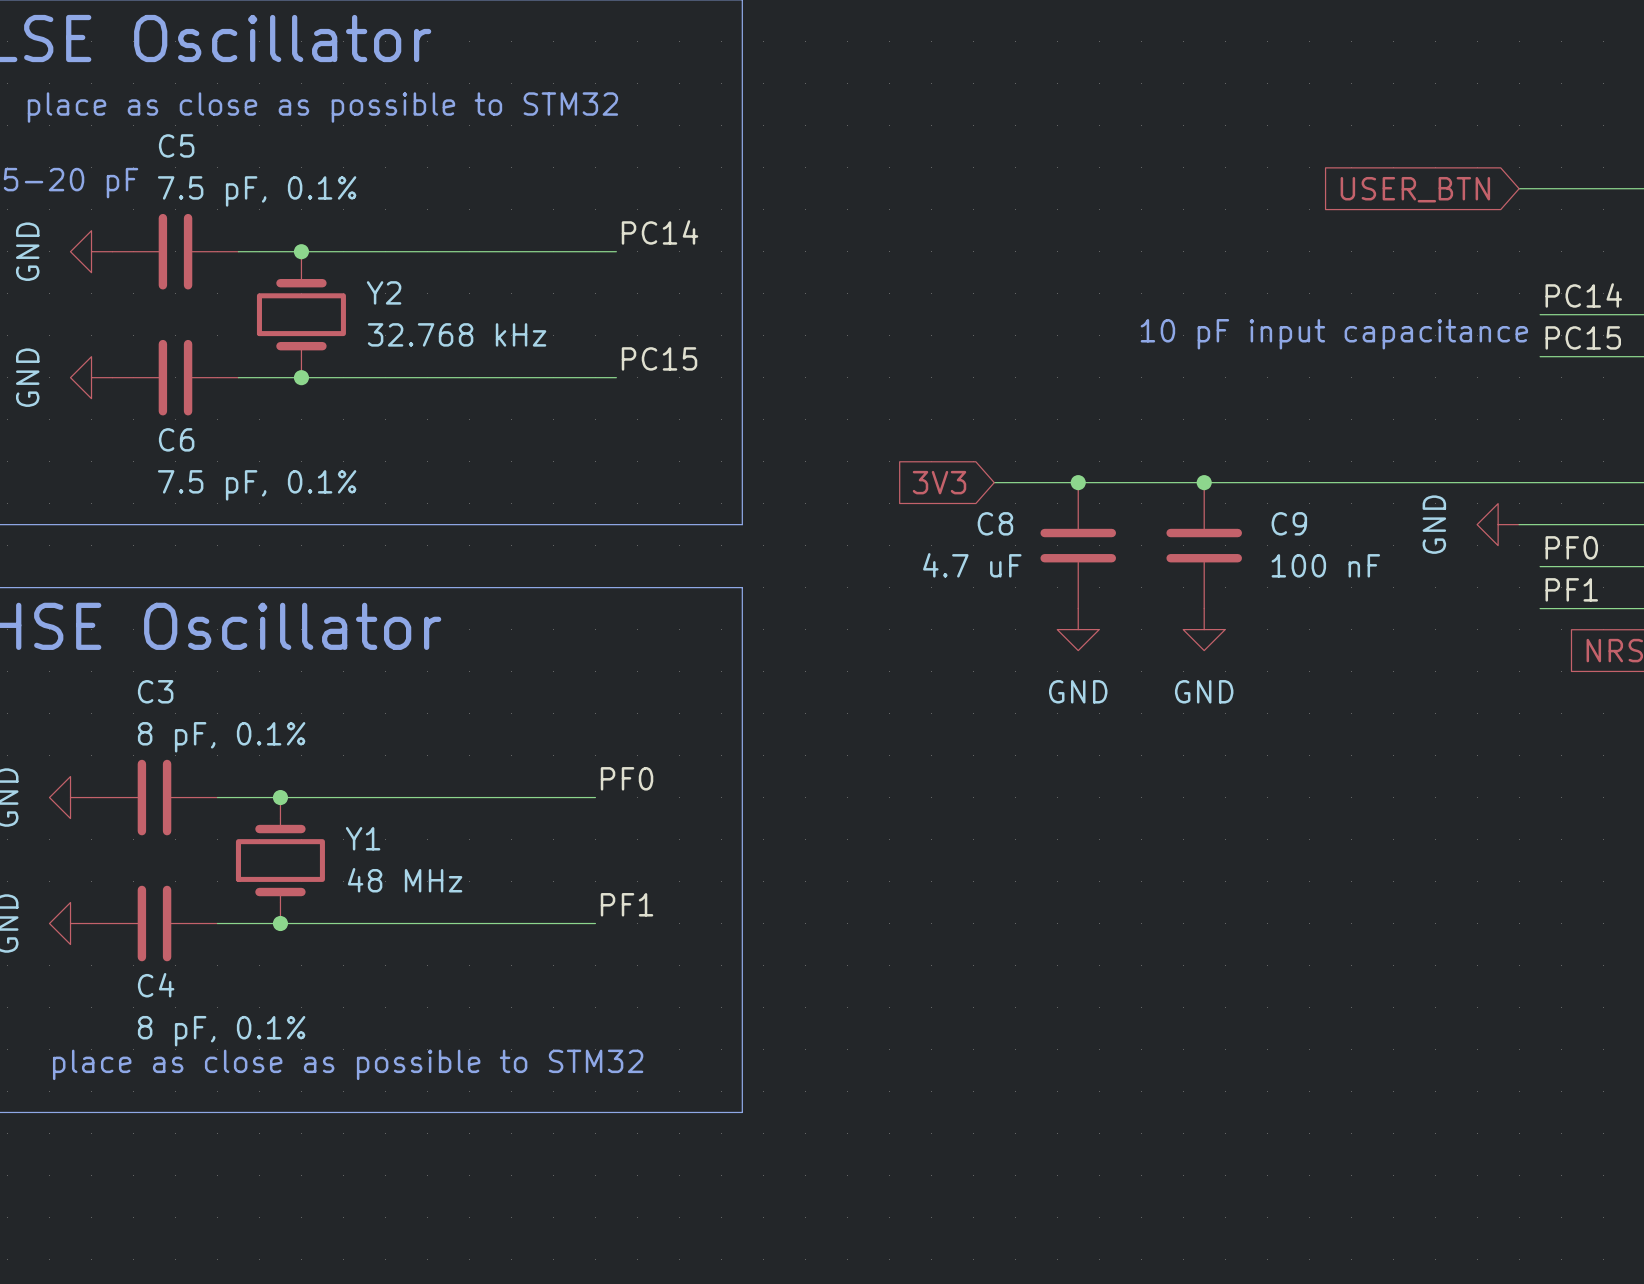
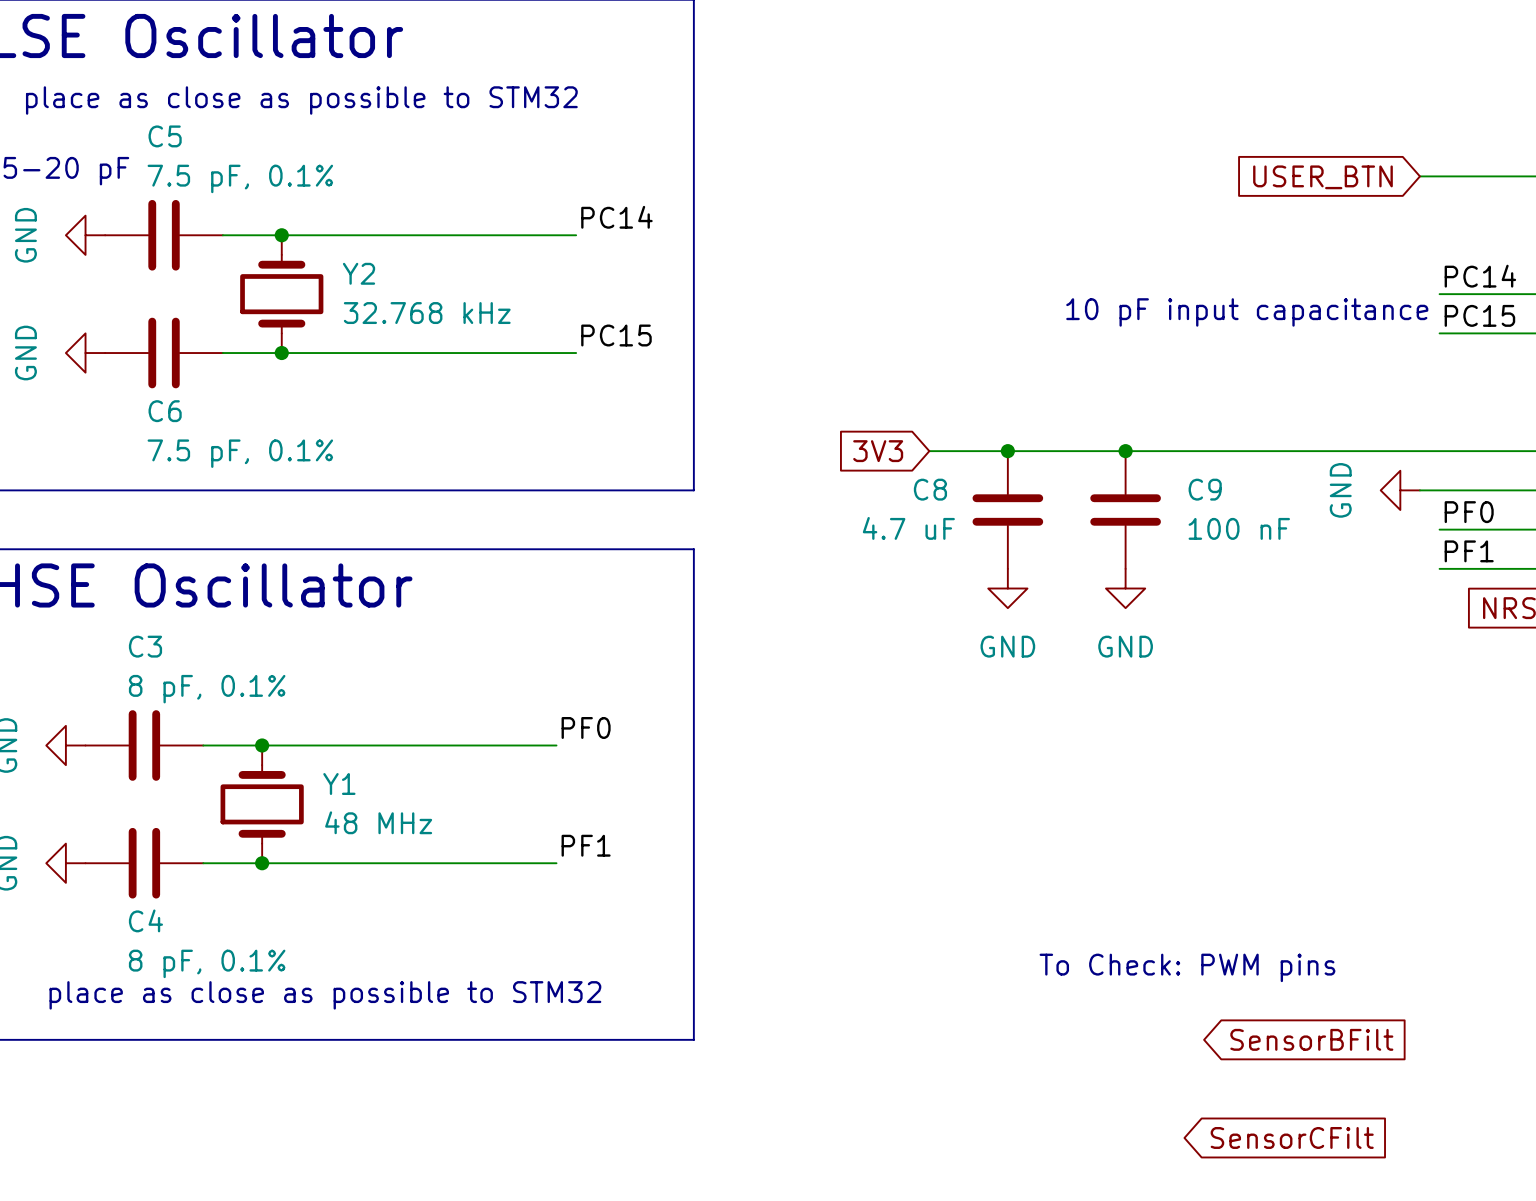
text: none -> To Check: PWM pins (1187, 967)
global label: none -> SensorBFilt (1311, 1039)
global label: none -> SensorCFilt (1292, 1137)

